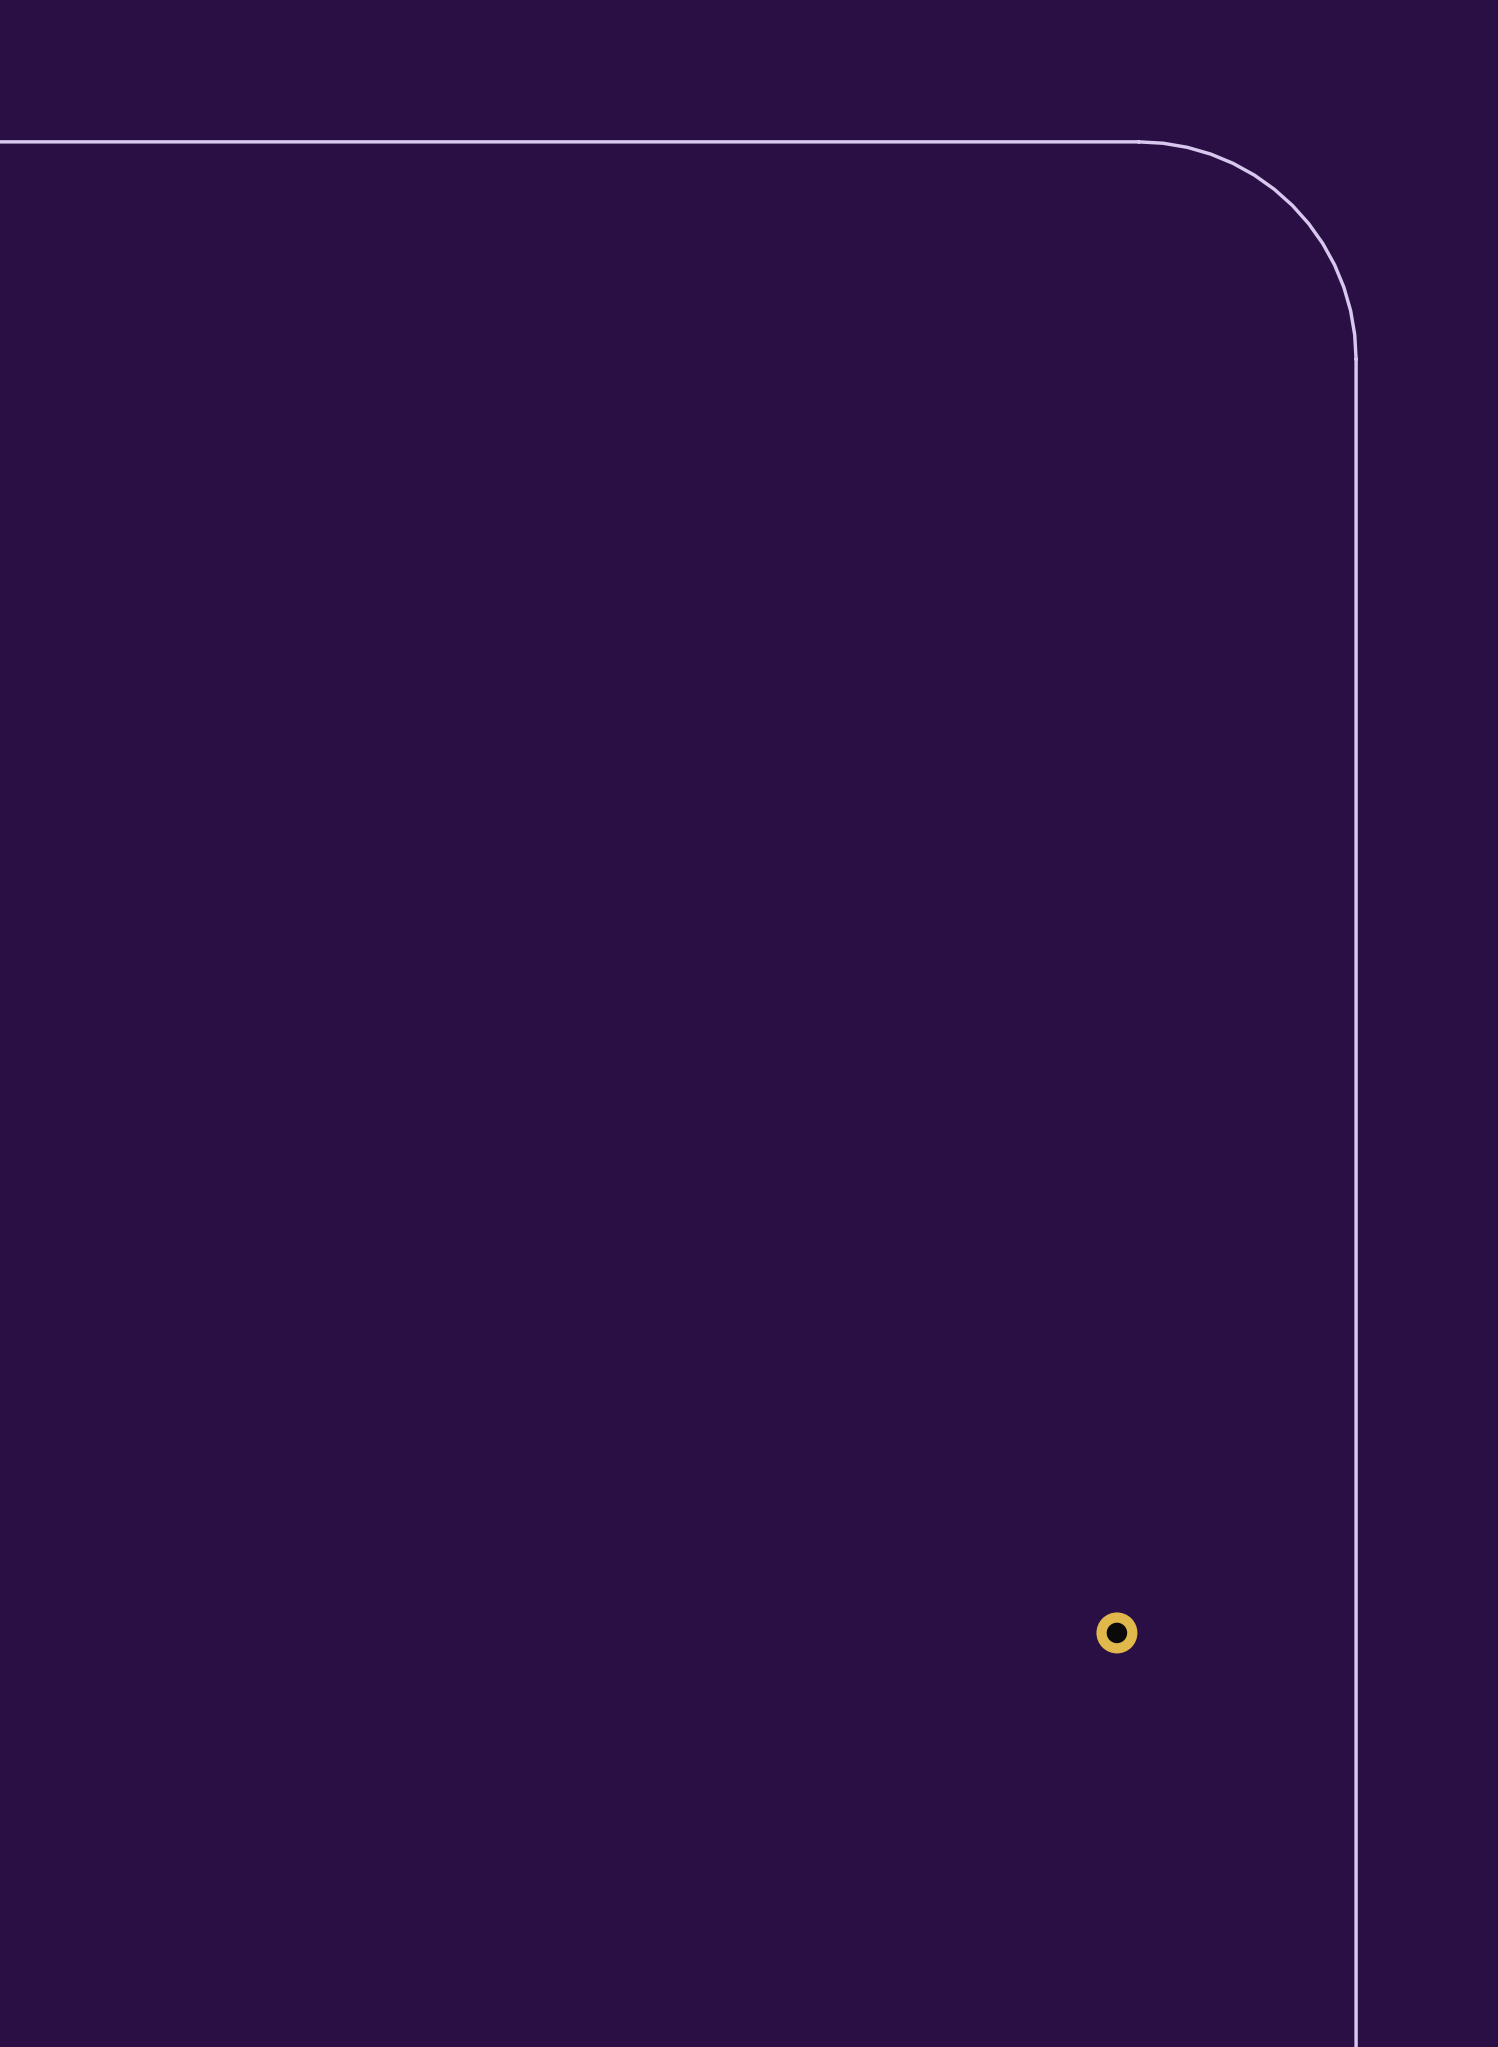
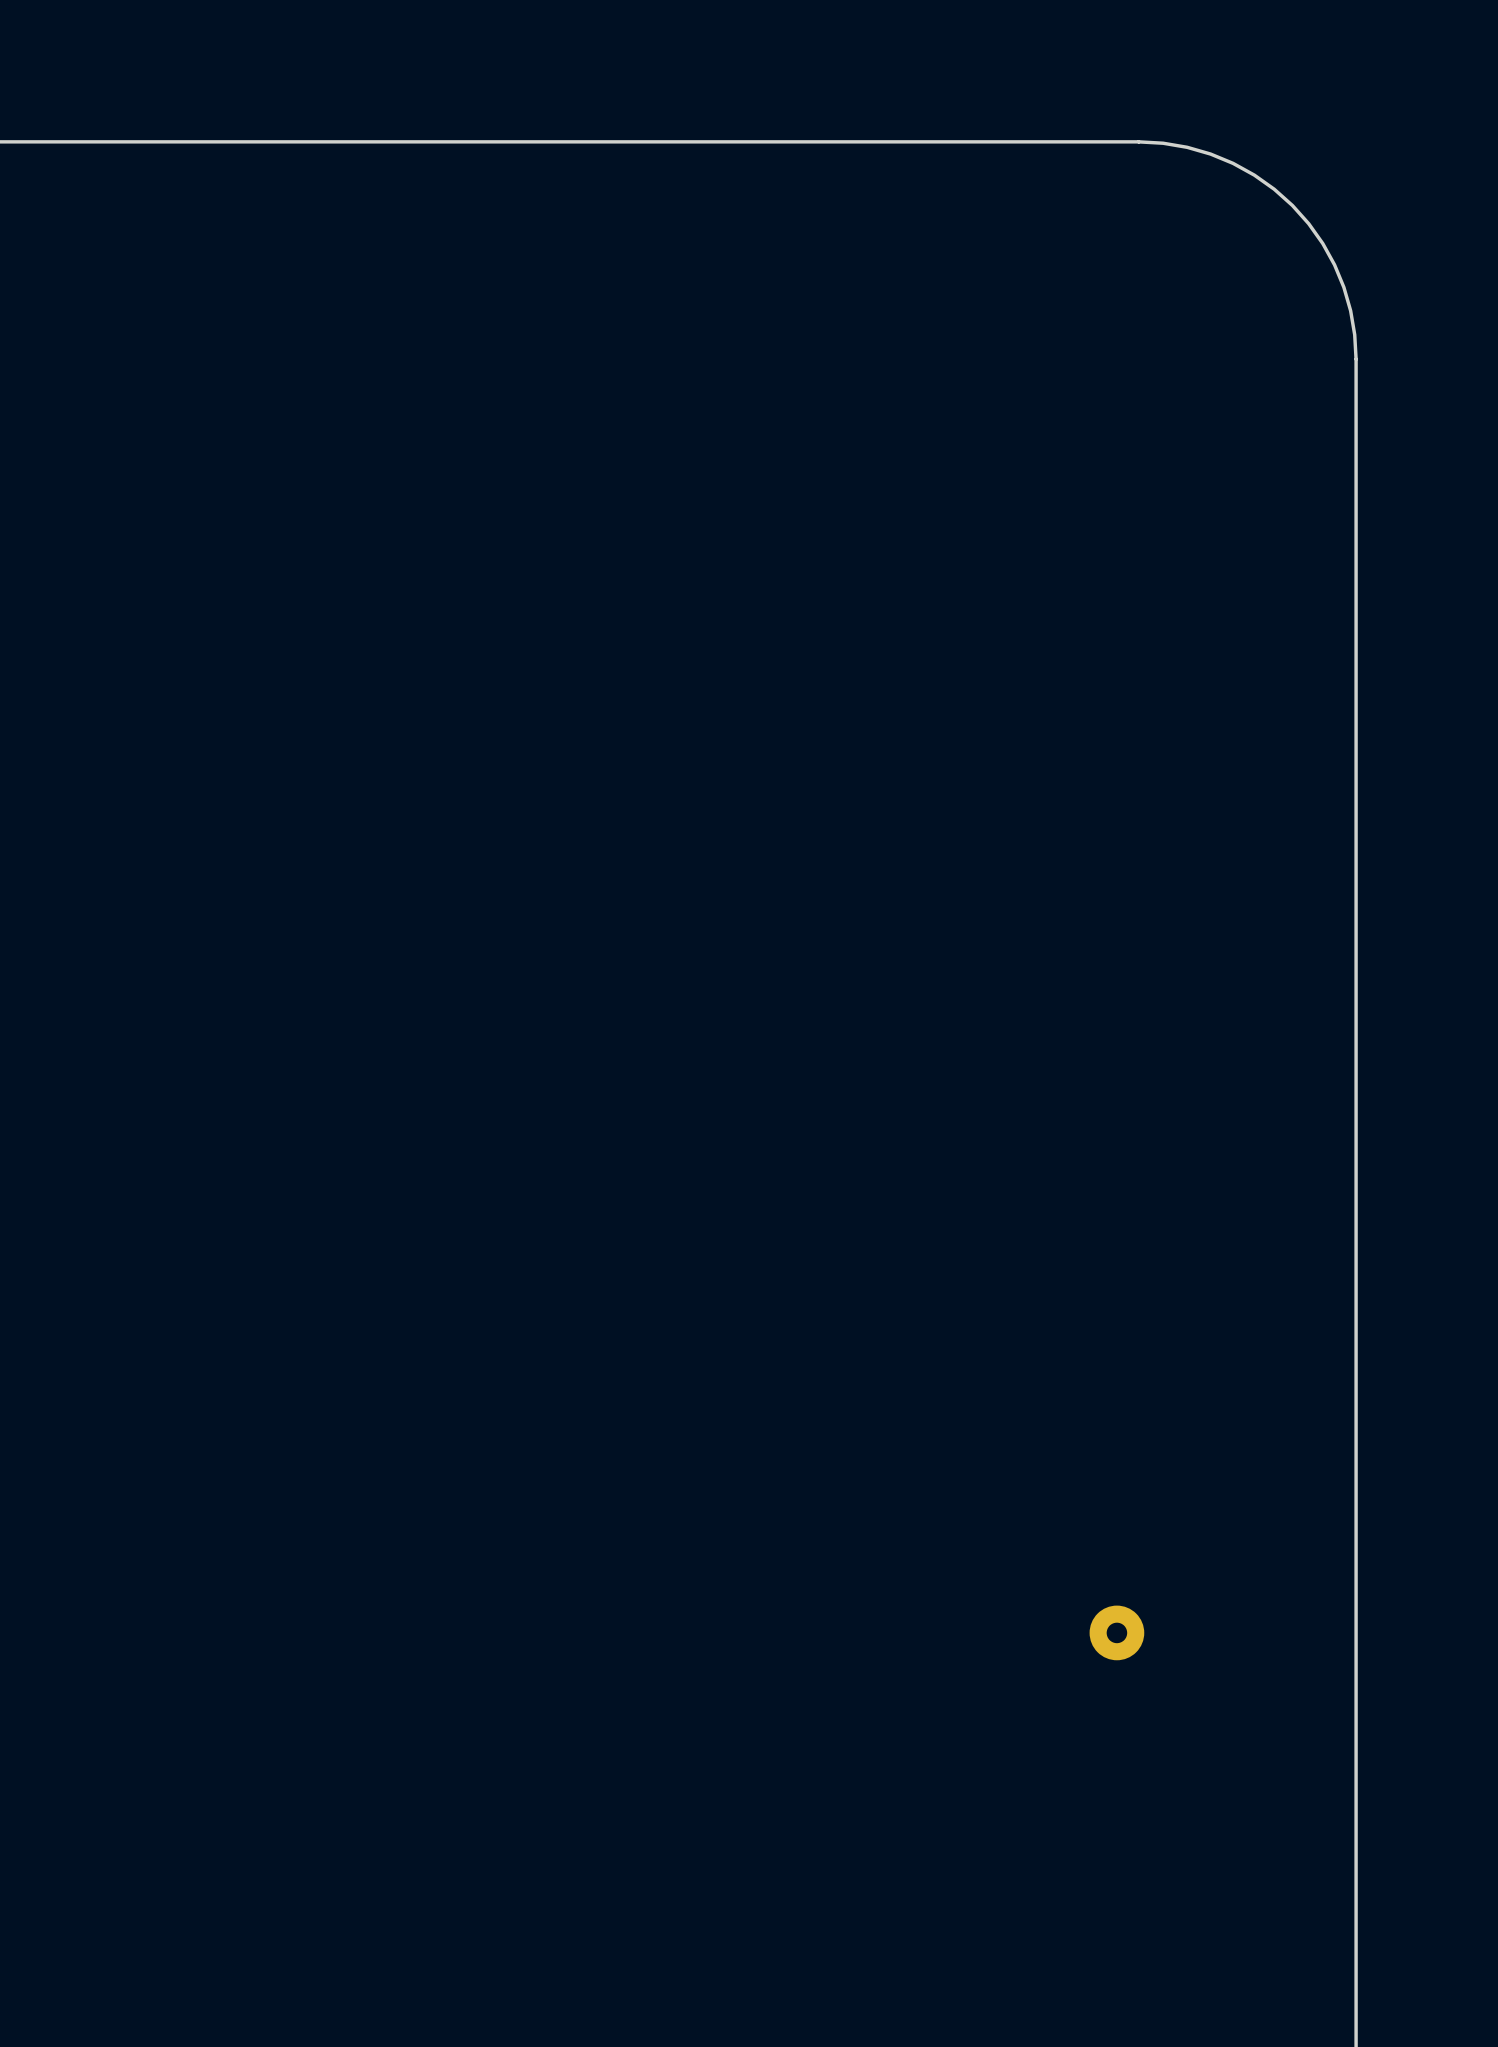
part footprint: [1096, 1612, 1138, 1654] -> [1089, 1605, 1145, 1661]

